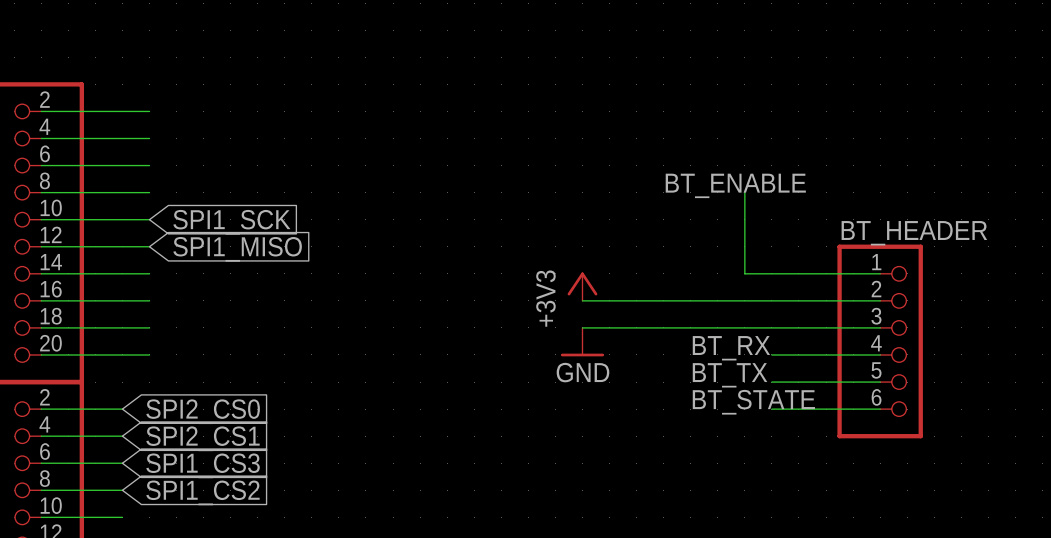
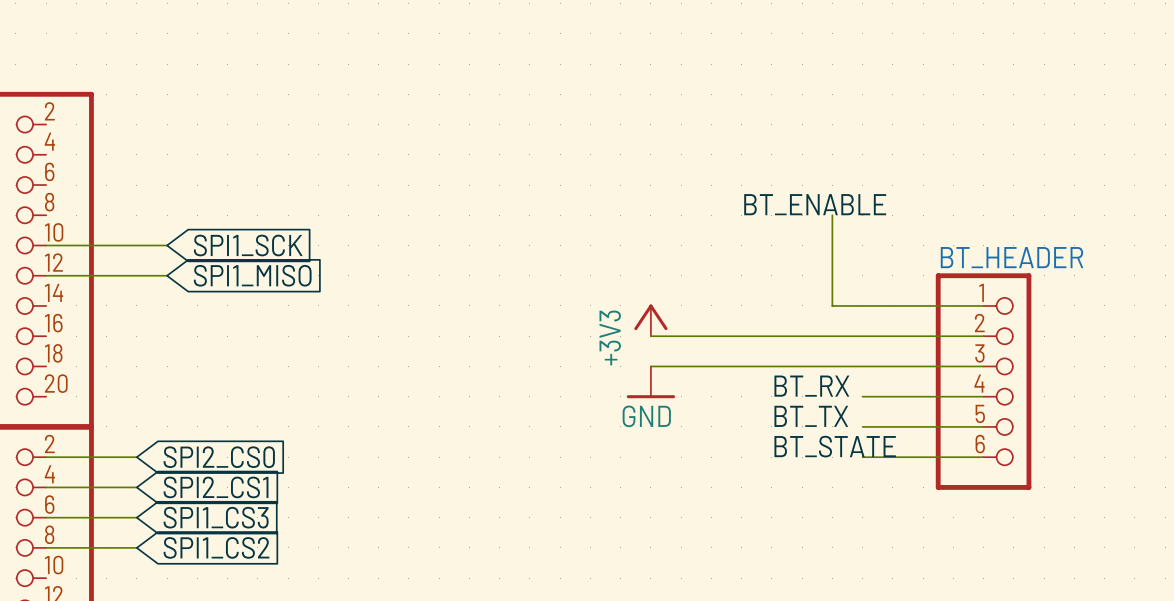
wire: (41, 111) (149, 111) -> none
wire: (41, 138) (149, 138) -> none
wire: (41, 165) (149, 165) -> none
wire: (41, 192) (149, 192) -> none
wire: (41, 273) (149, 273) -> none
wire: (41, 300) (149, 300) -> none
wire: (41, 327) (149, 327) -> none
wire: (41, 354) (149, 354) -> none
wire: (41, 517) (122, 517) -> none

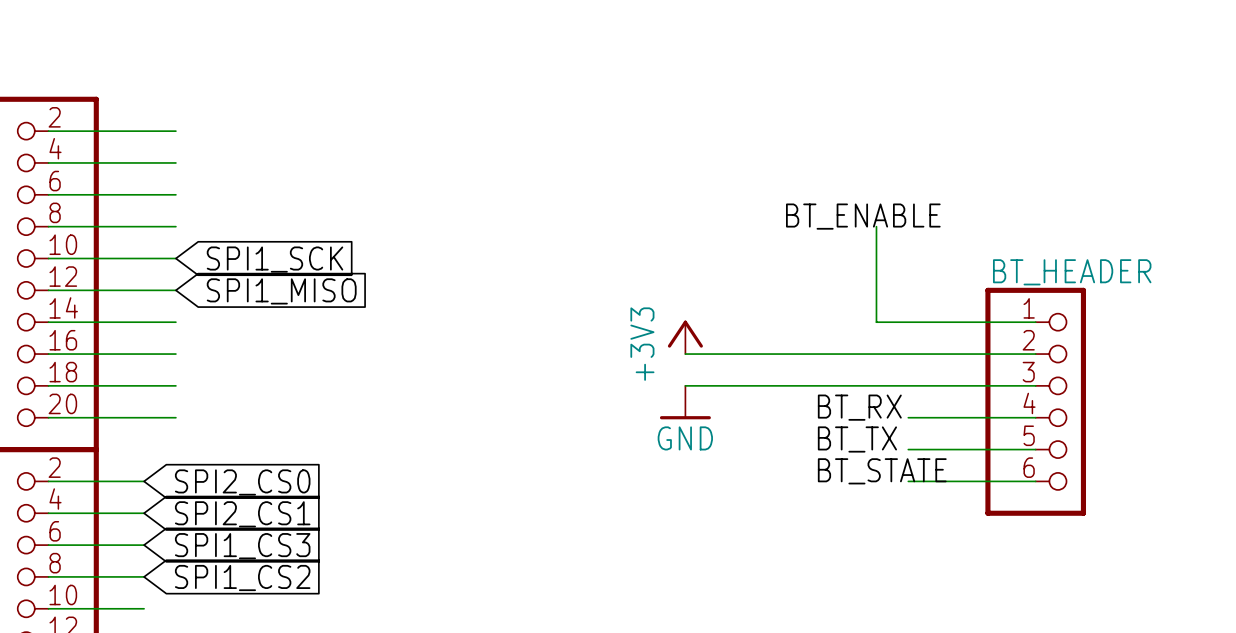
wire: none -> (48, 131) (175, 131)
wire: none -> (48, 162) (175, 162)
wire: none -> (48, 194) (175, 194)
wire: none -> (48, 226) (175, 226)
wire: none -> (48, 322) (175, 322)
wire: none -> (48, 354) (175, 354)
wire: none -> (48, 385) (175, 385)
wire: none -> (48, 417) (175, 417)
wire: none -> (48, 608) (144, 608)

